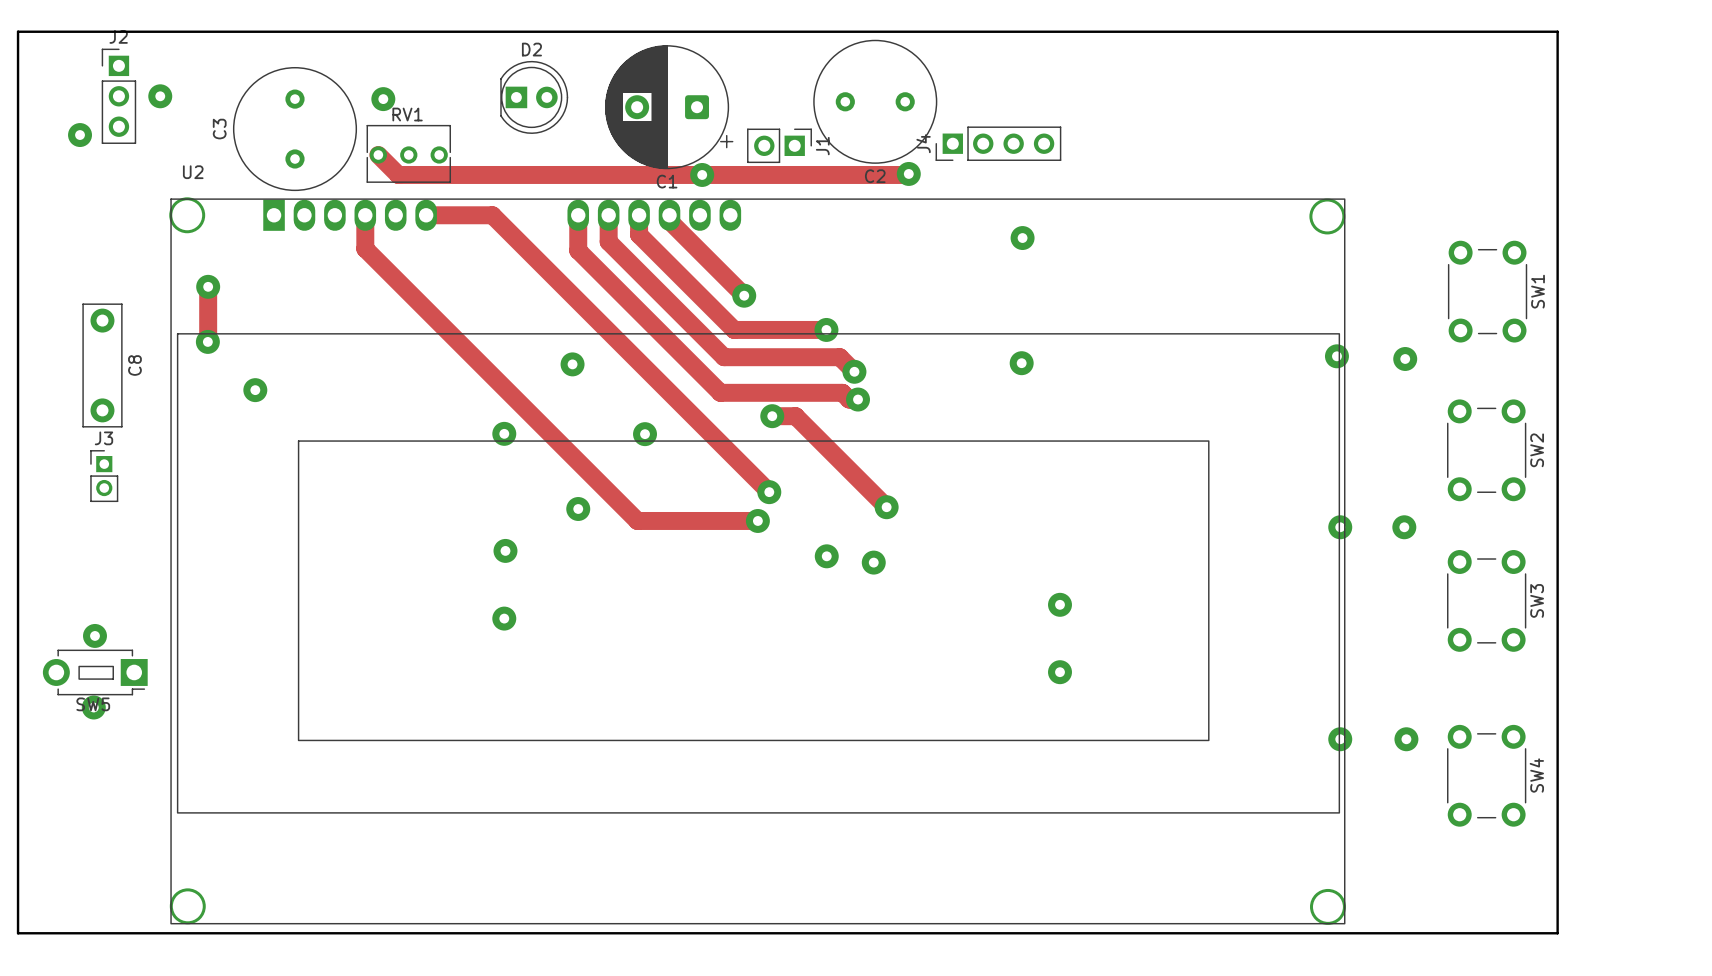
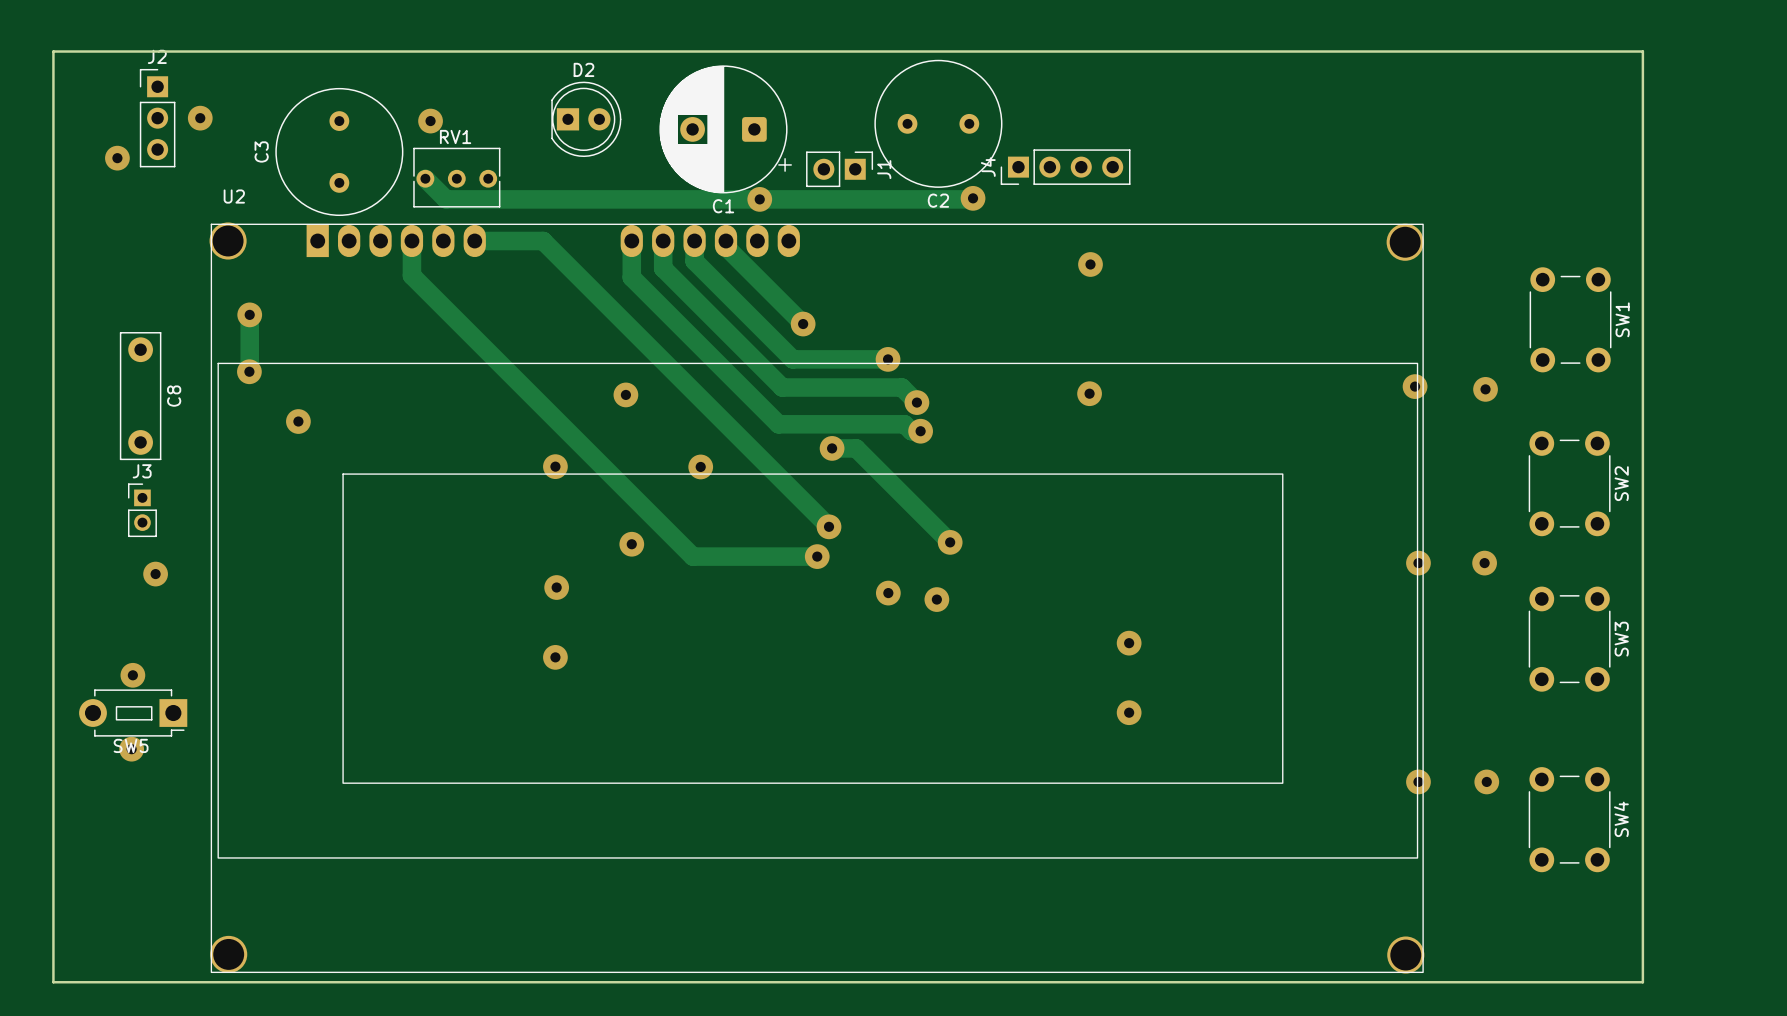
via: none -> (155, 574)

